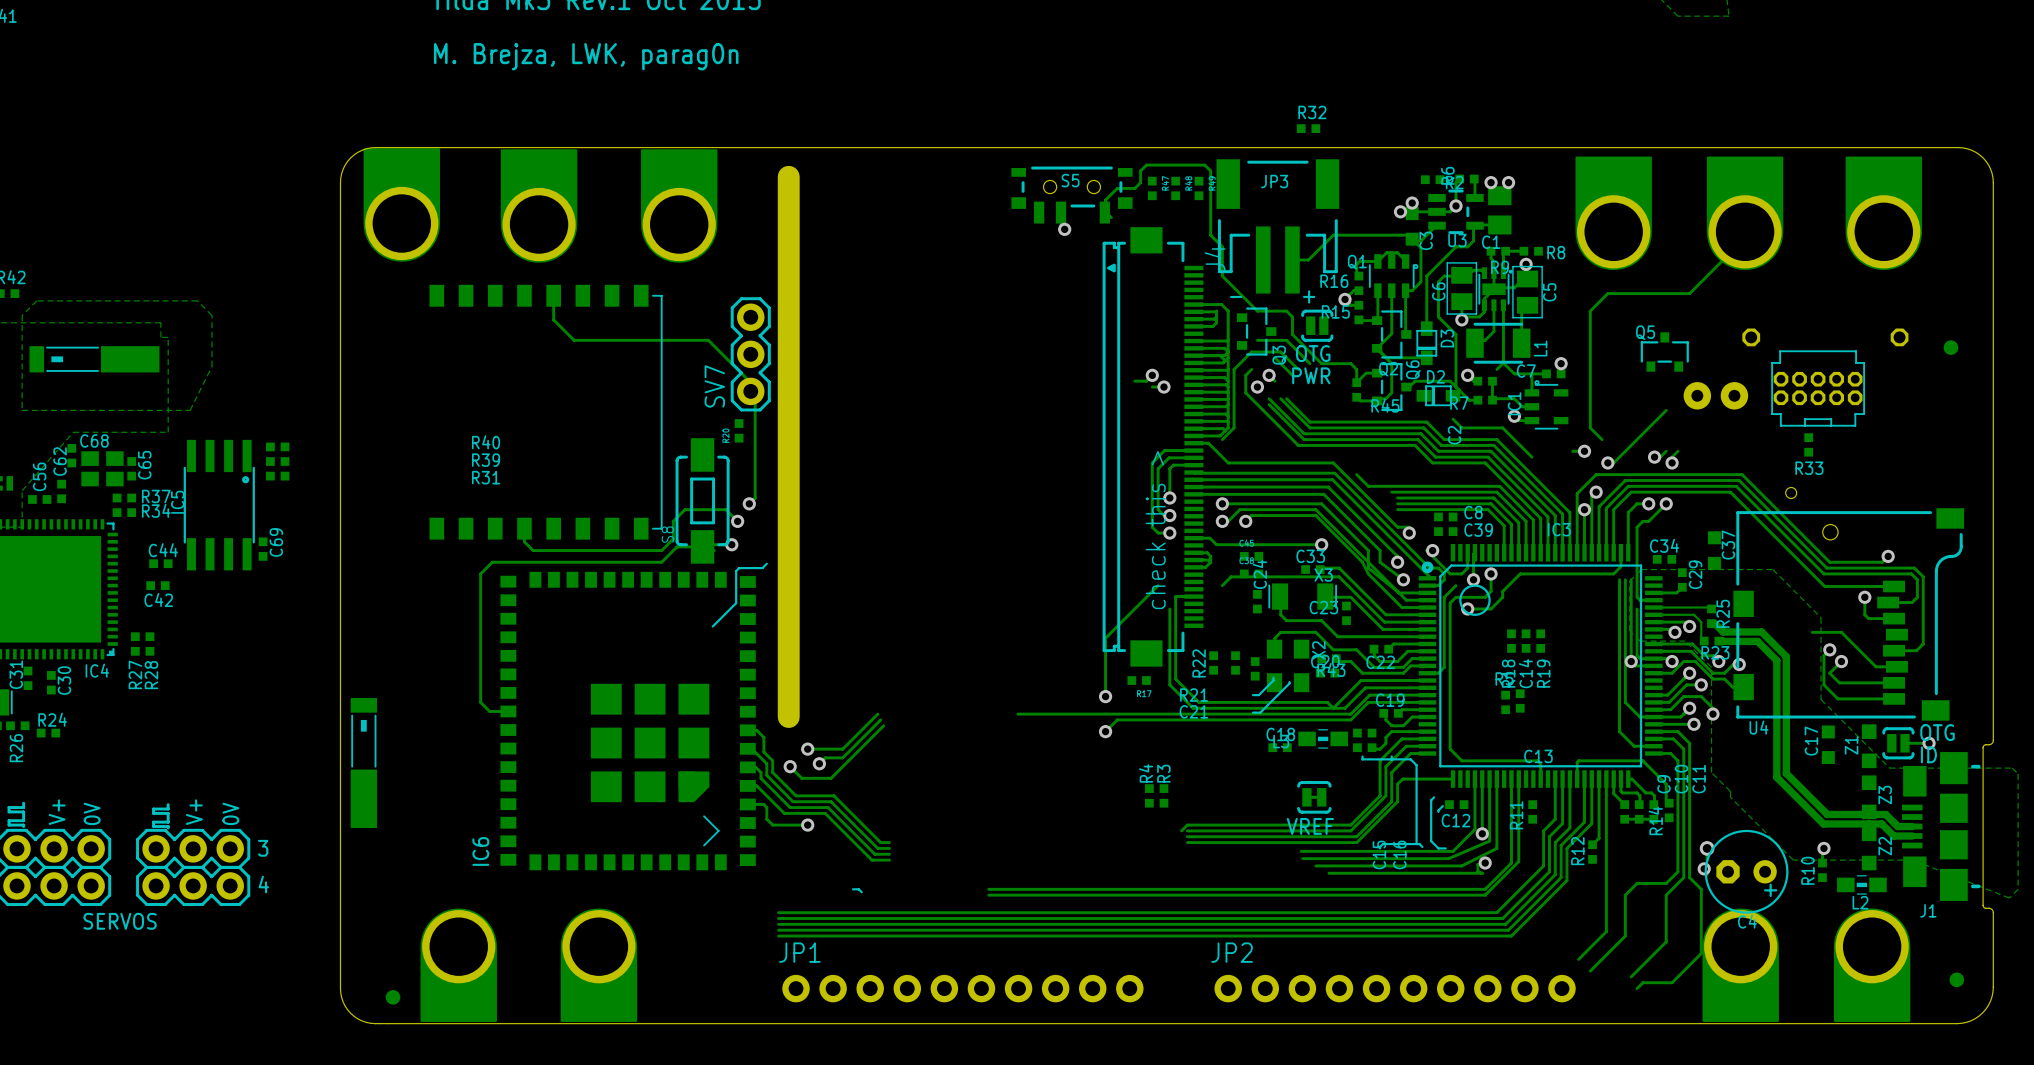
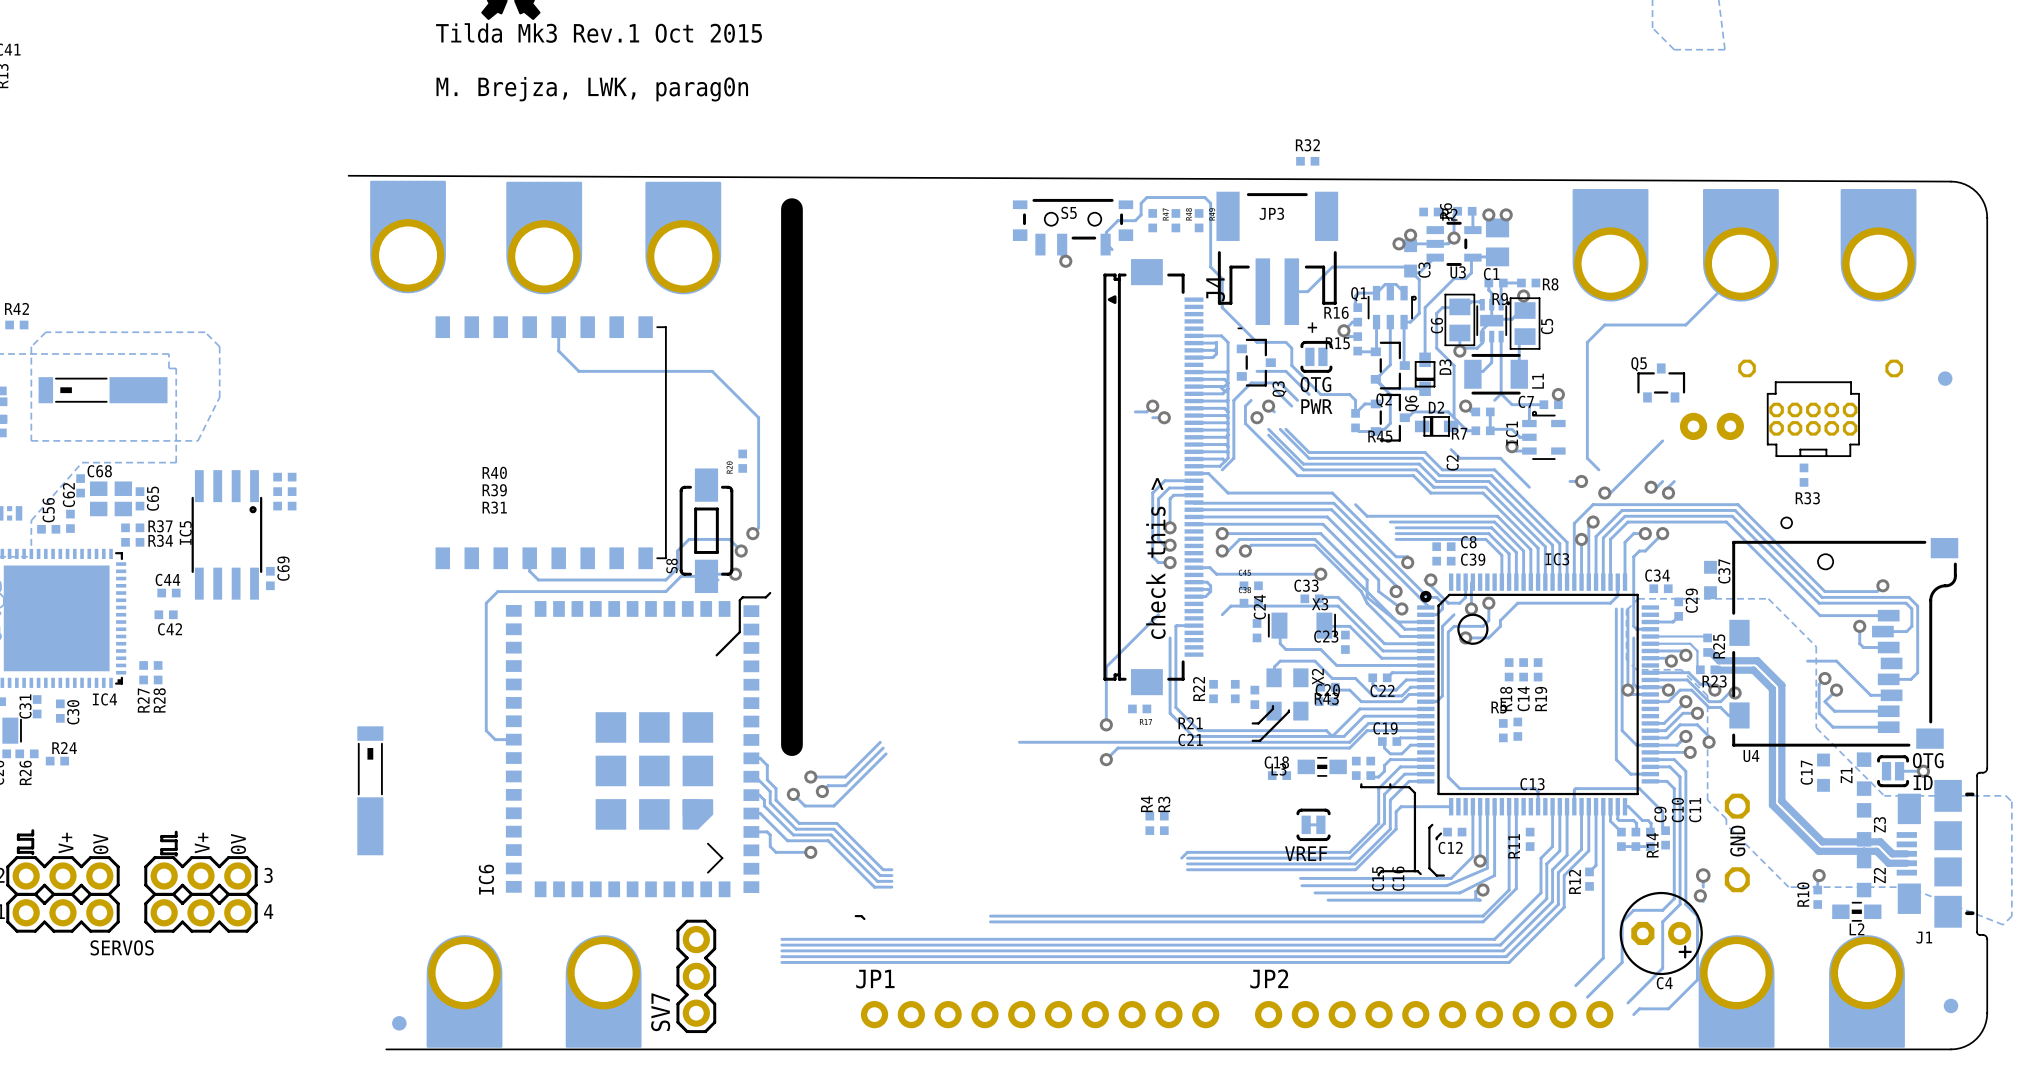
board edge: (1993, 185) (1990, 169) (1983, 157) (1971, 150) (1958, 147) (375, 147) (358, 152) (345, 165) (340, 182) (340, 988) (343, 1002) (350, 1013) (362, 1020) (379, 1023) -> (1987, 217) (1984, 203) (1976, 192) (1964, 184) (1951, 181) (348, 175)
SV7 position: (750, 354) -> (696, 976)
part: none -> (1737, 842)
C4 position: (1746, 871) -> (1661, 933)
JP1 position: (962, 988) -> (1040, 1014)
JP2 position: (1395, 988) -> (1434, 1014)

